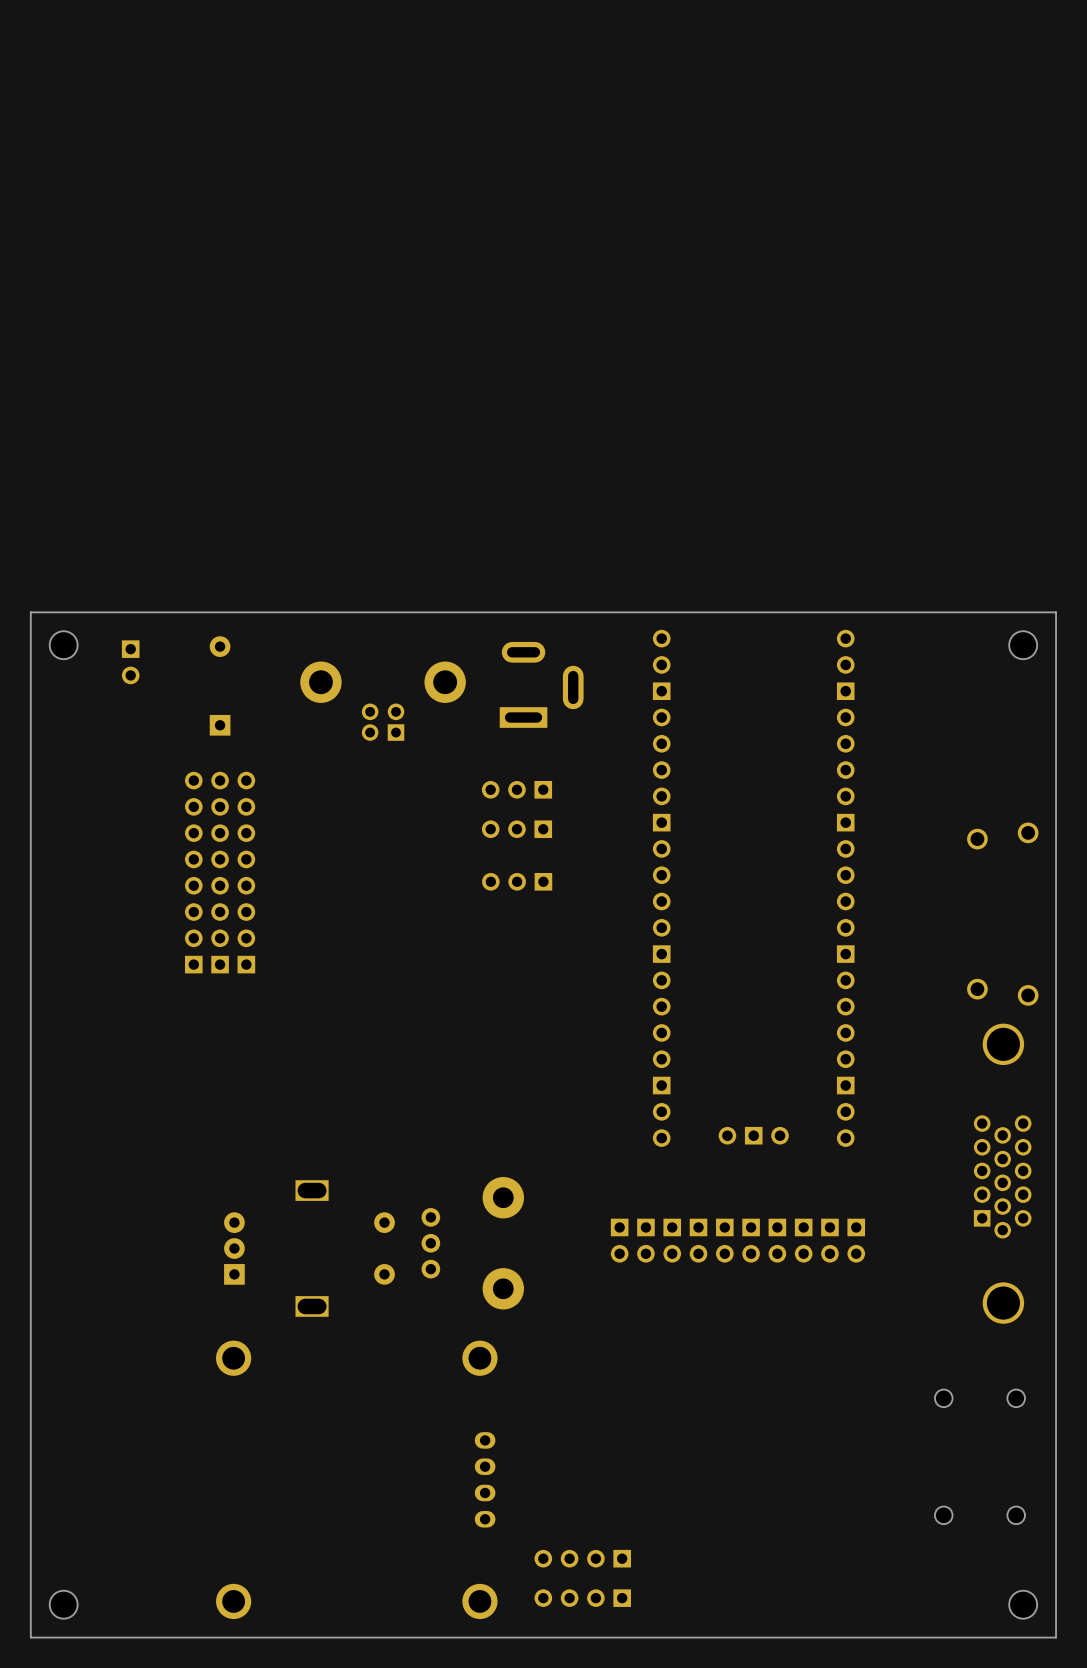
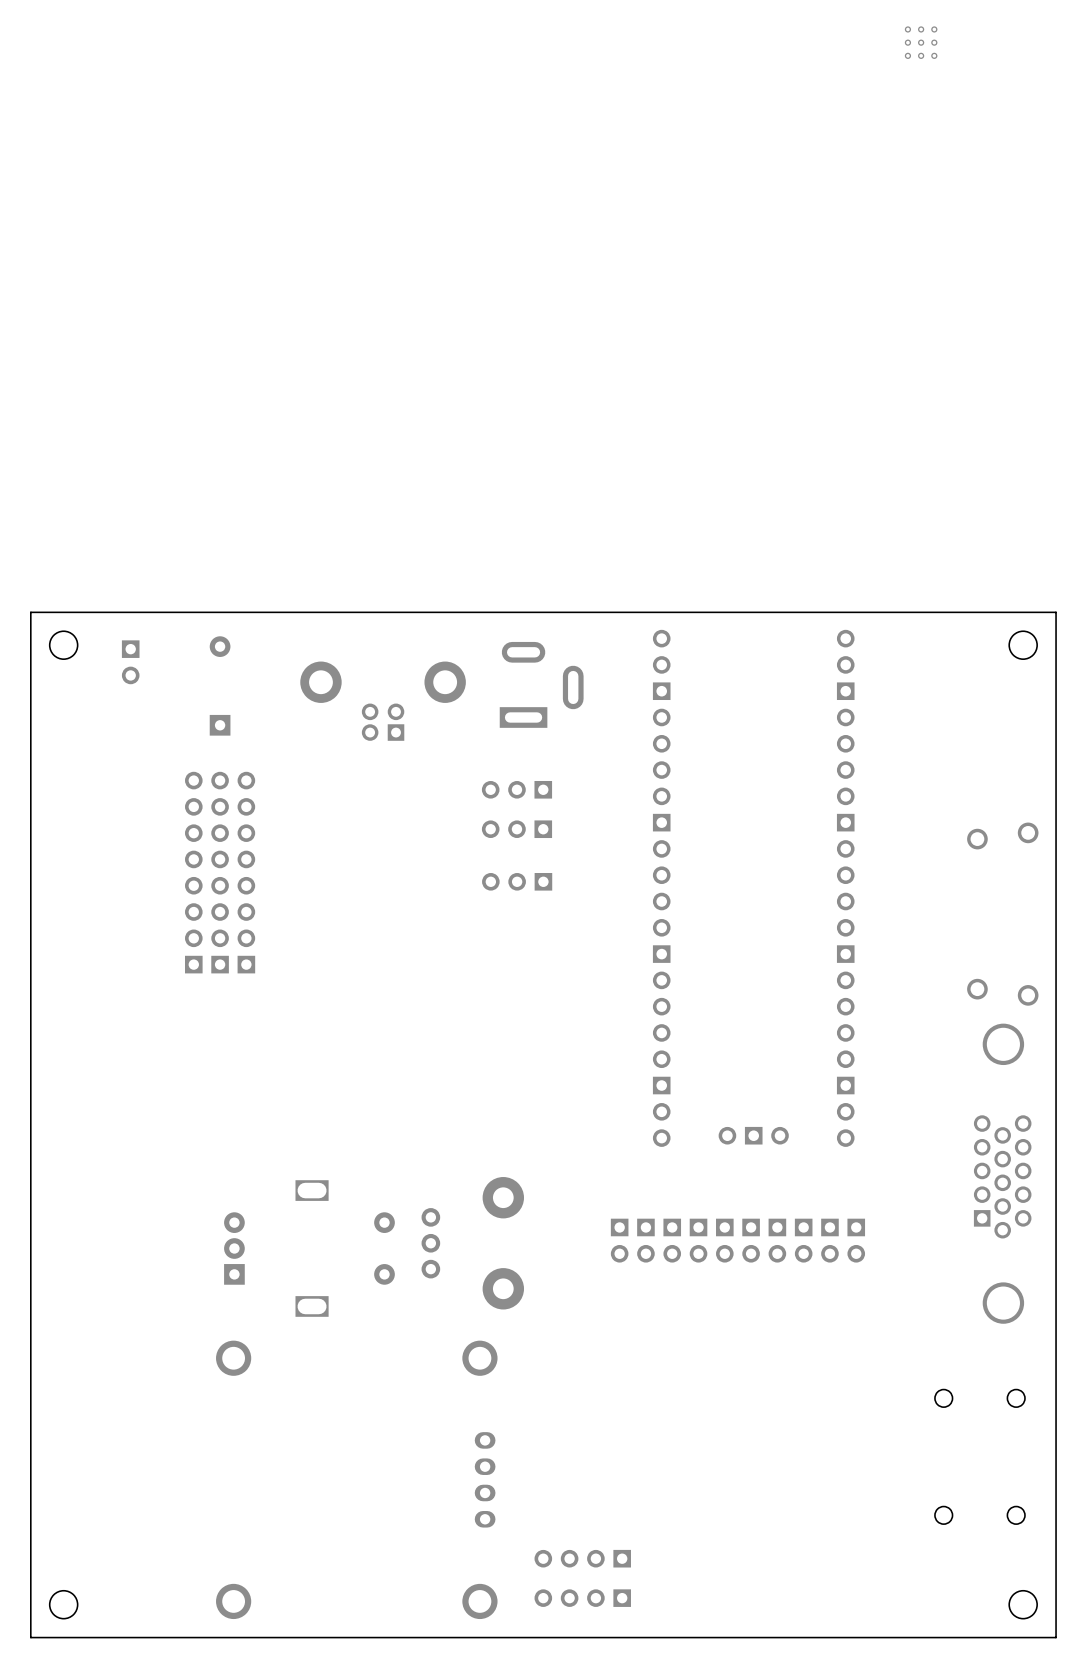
part: none -> (921, 42)

